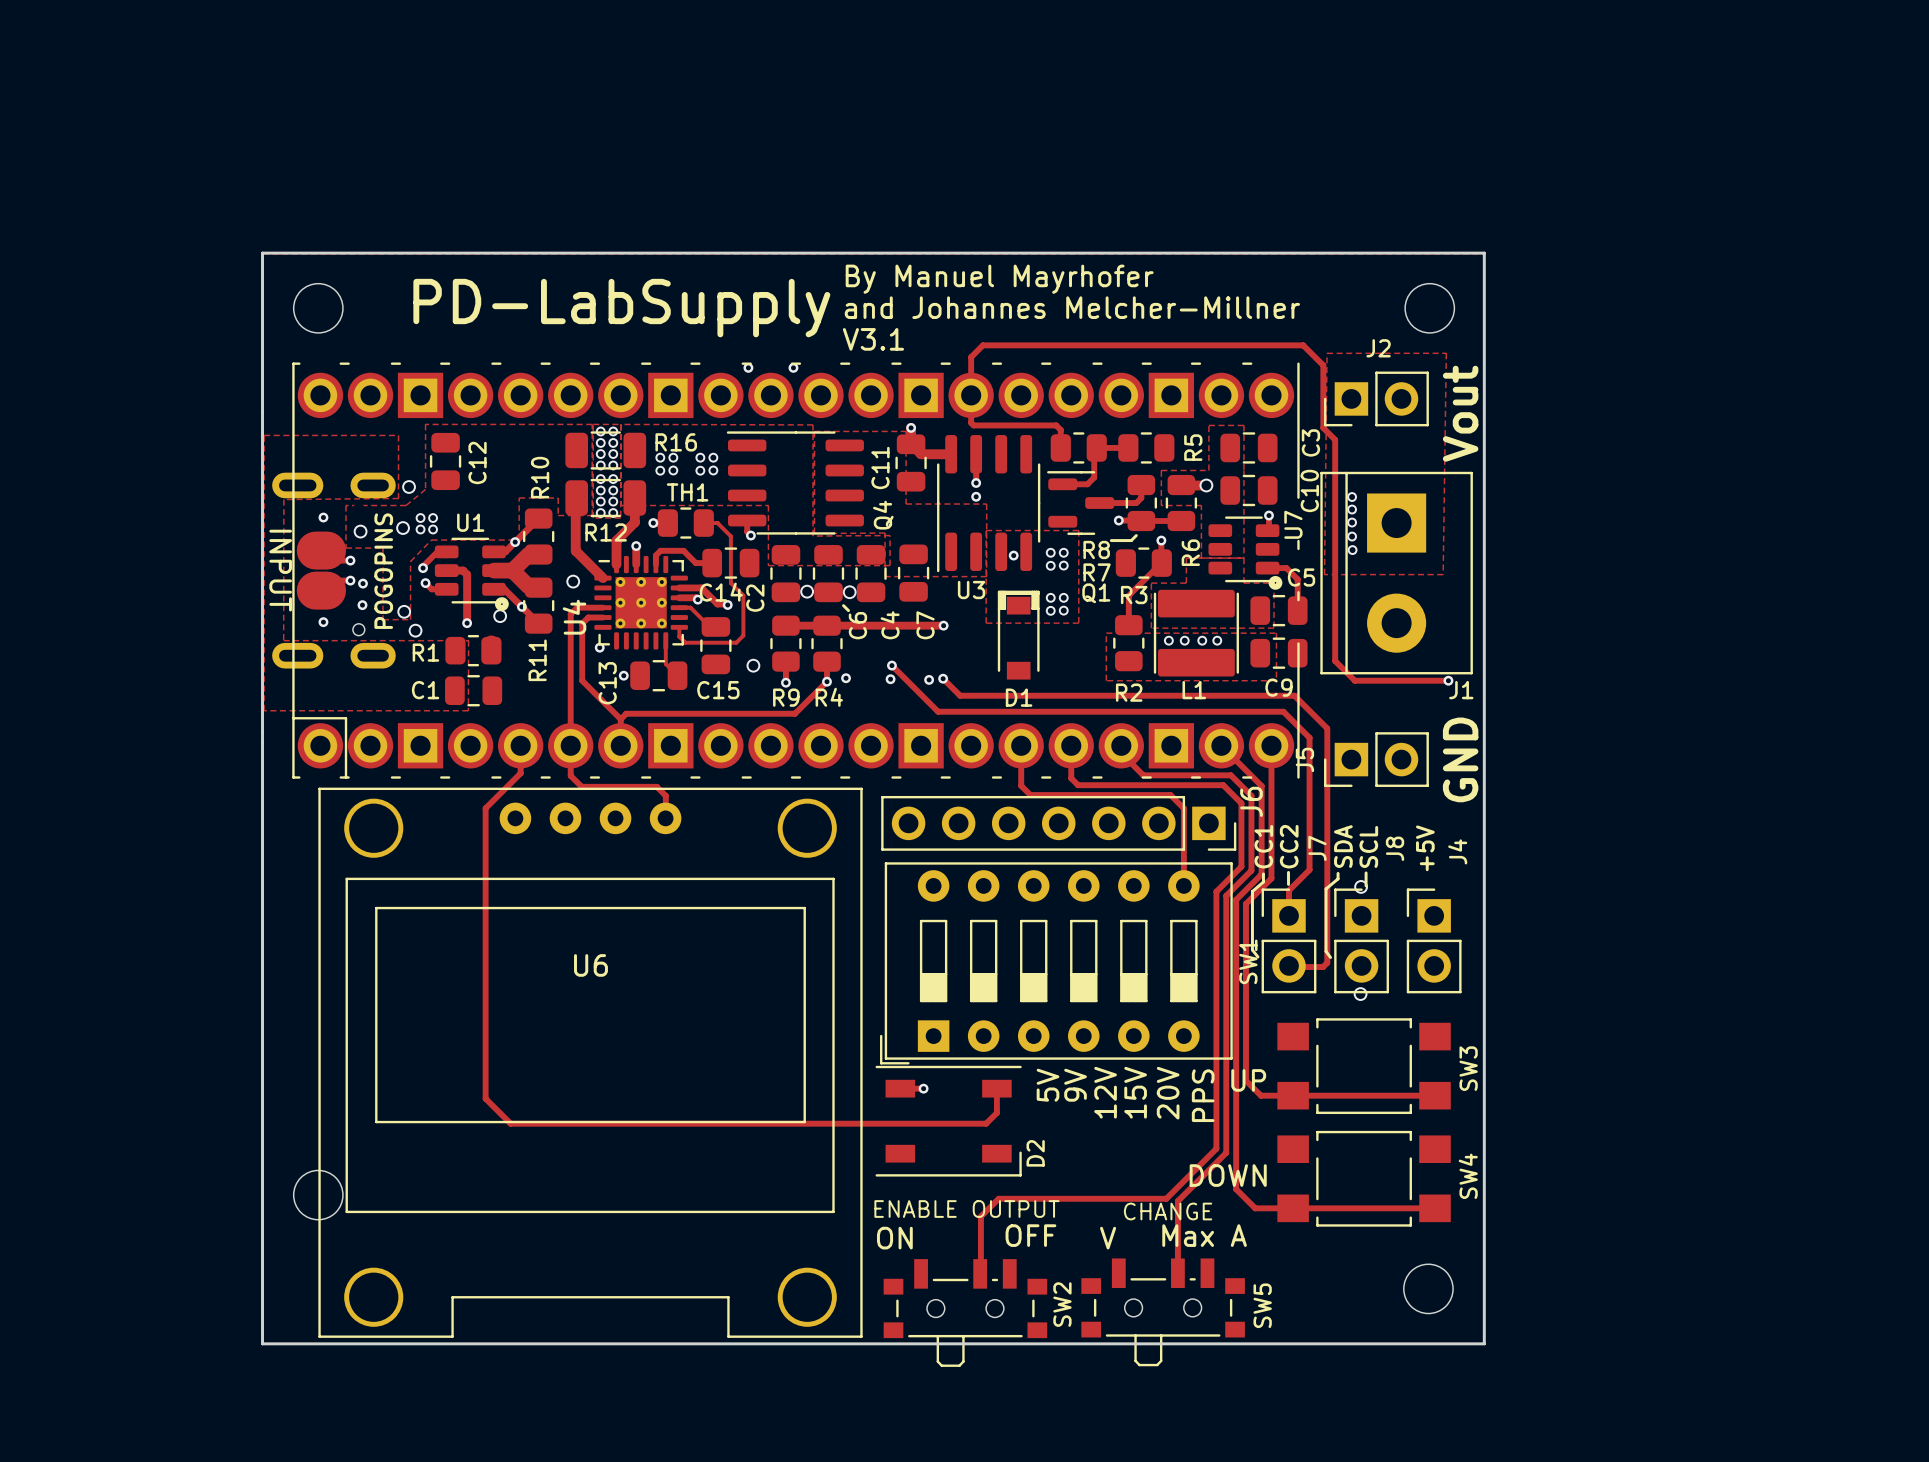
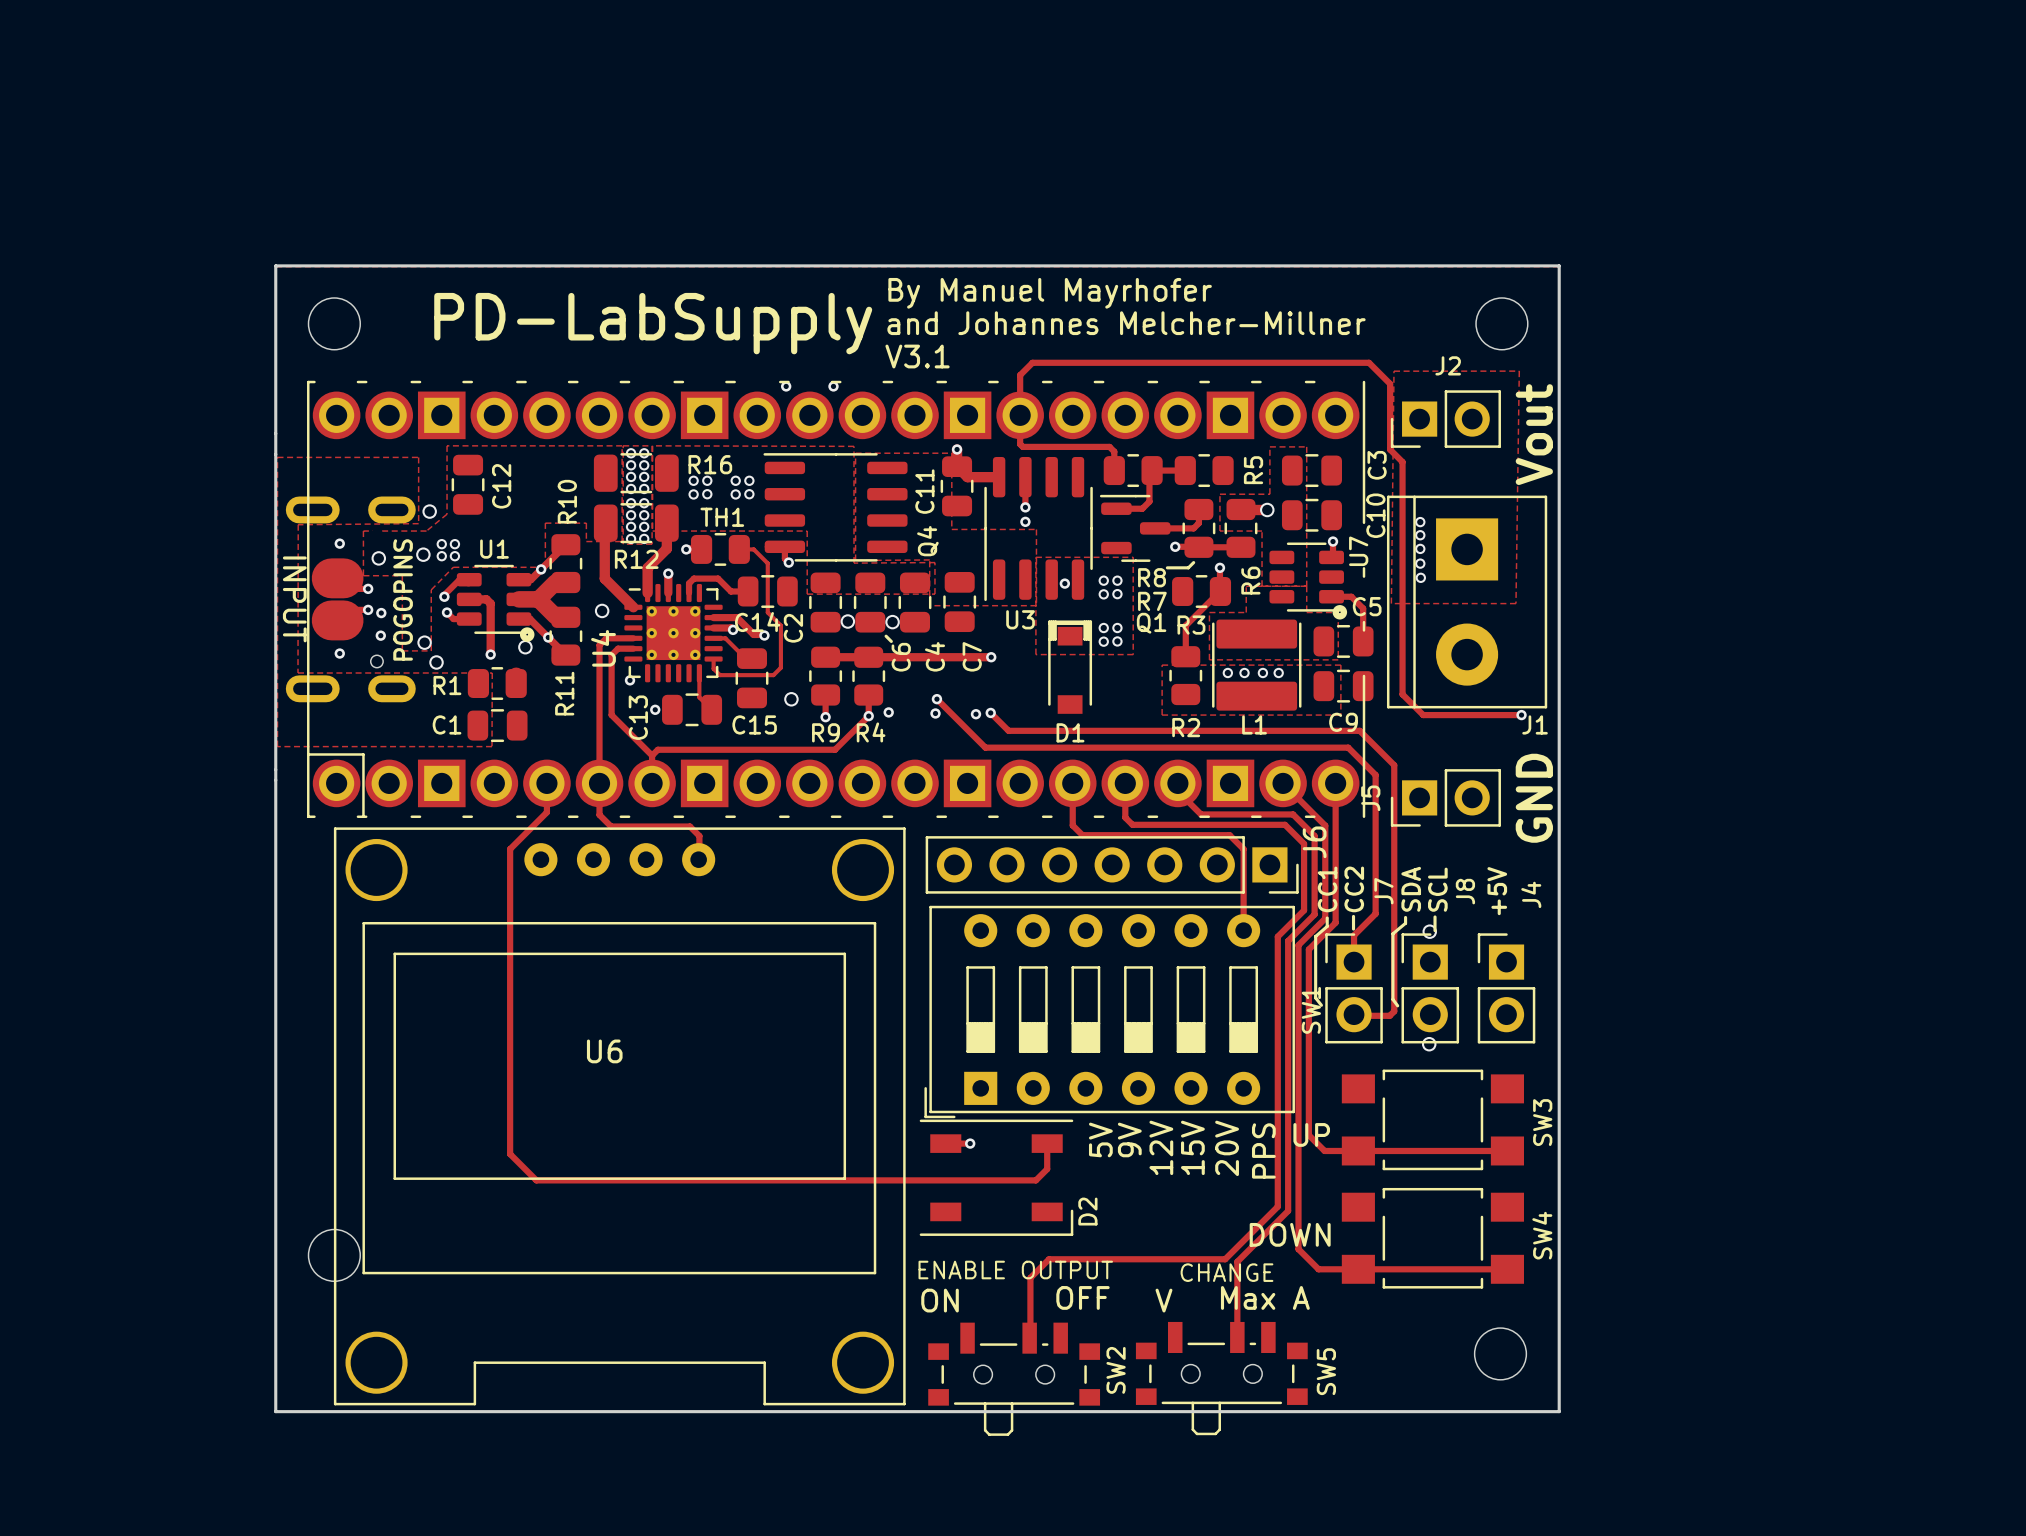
U6 footprint: [318, 787, 863, 1338] -> [333, 827, 906, 1406]
U6 name position: U6 (590, 965) -> U6 (604, 1051)

